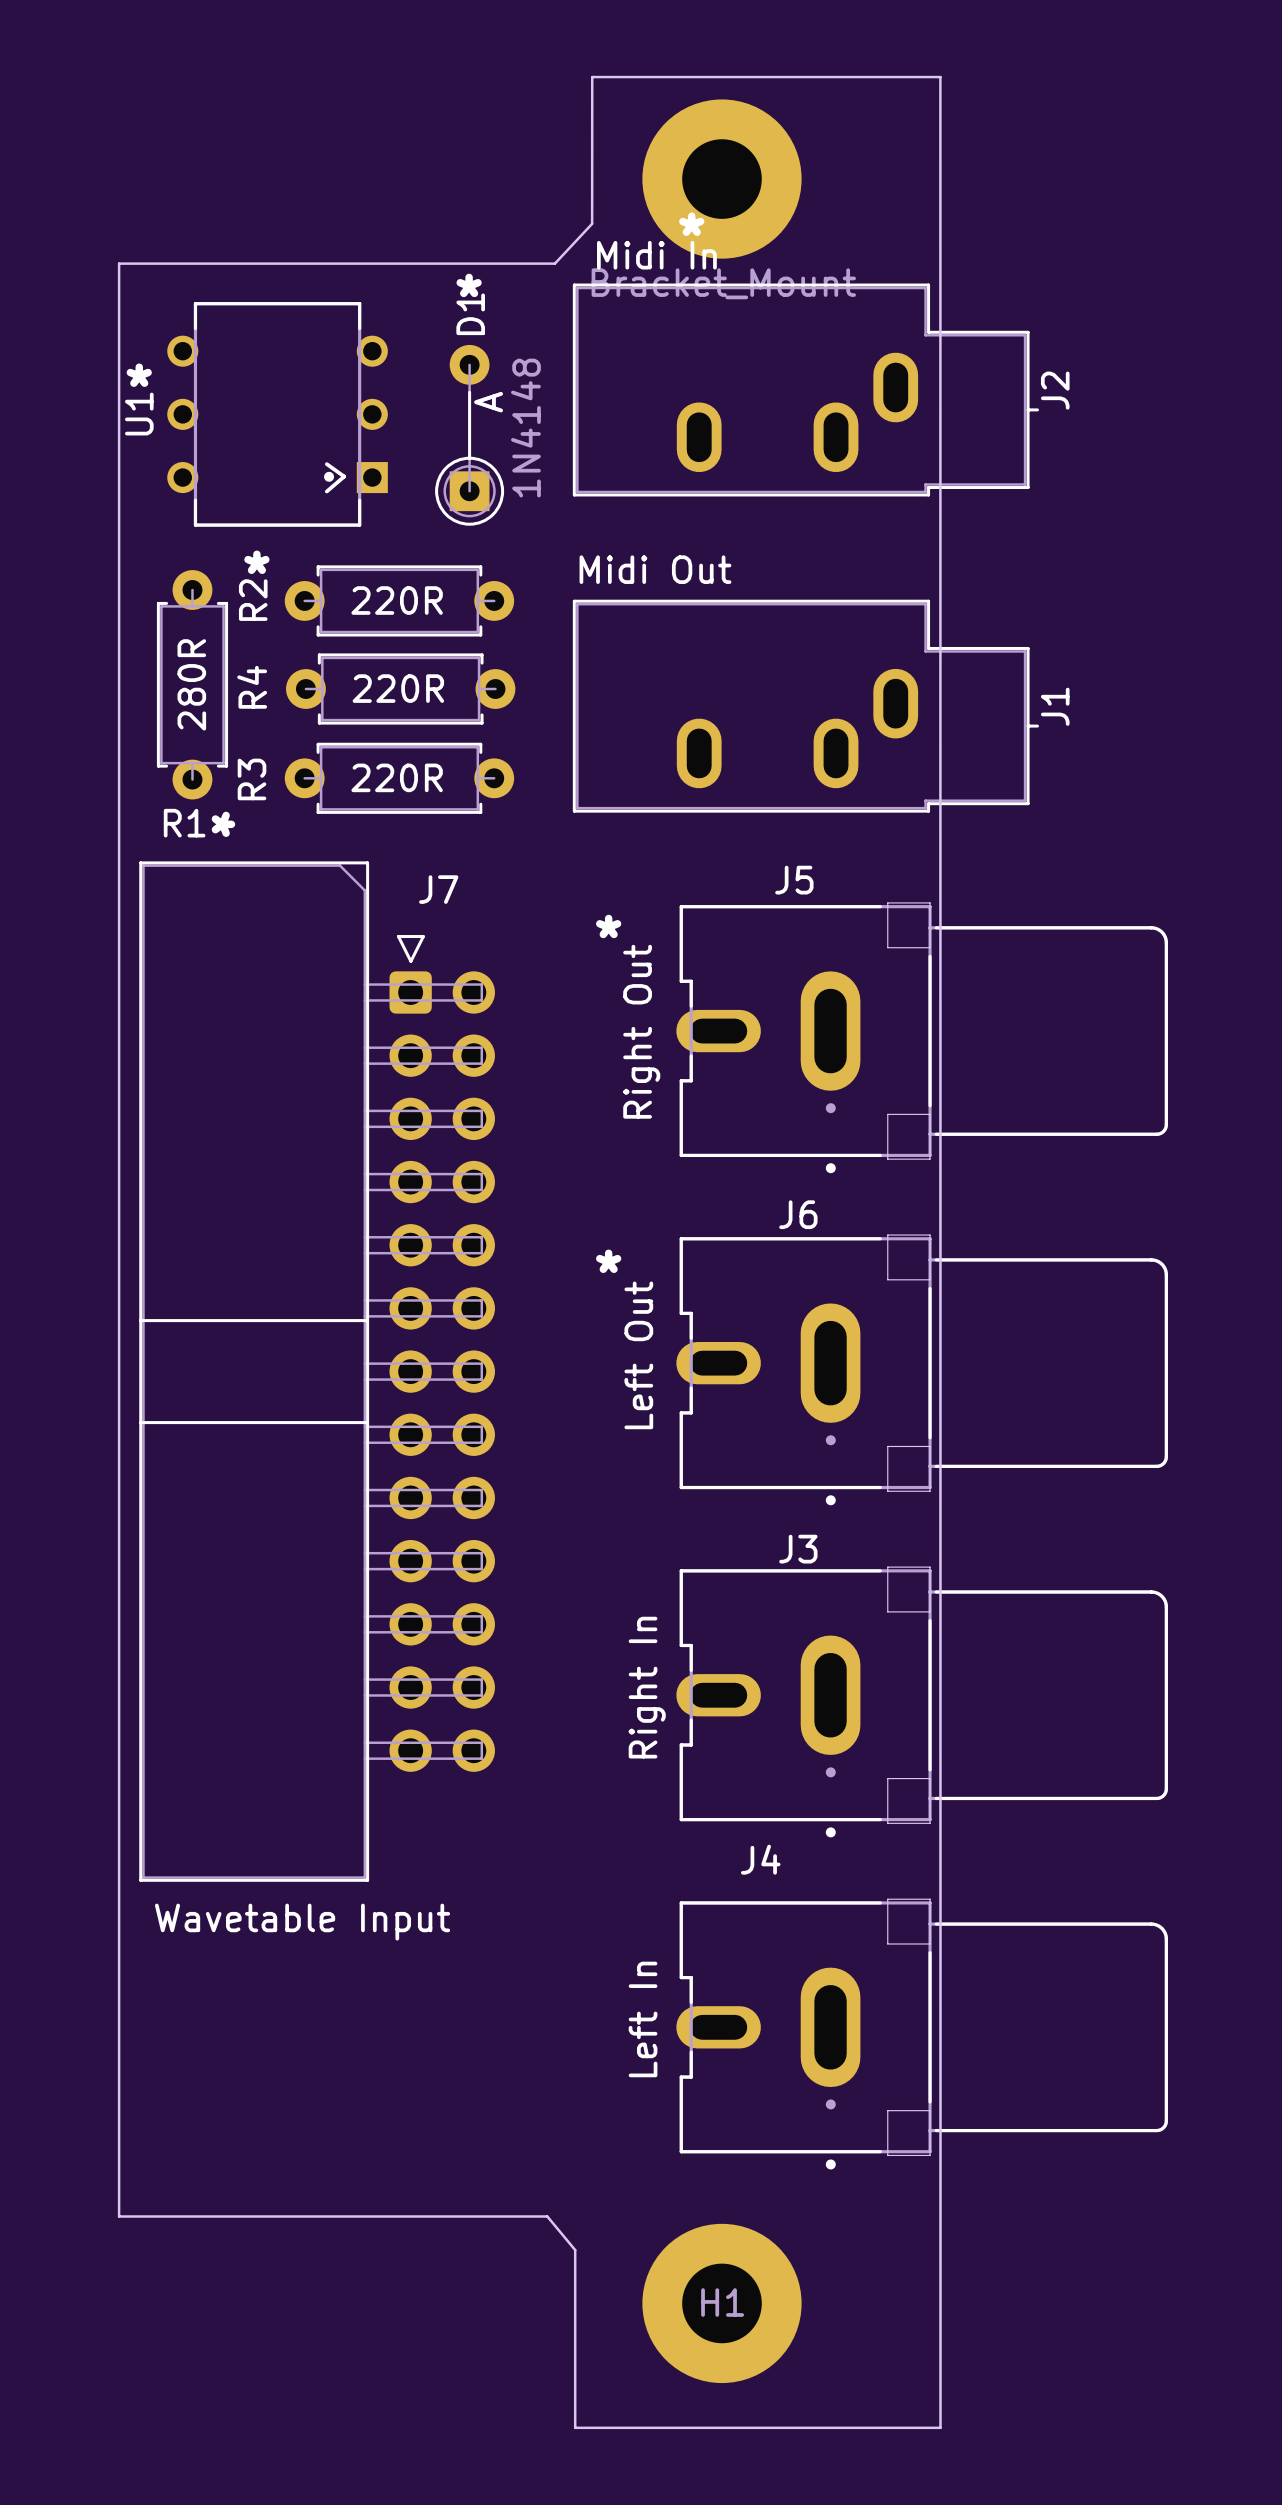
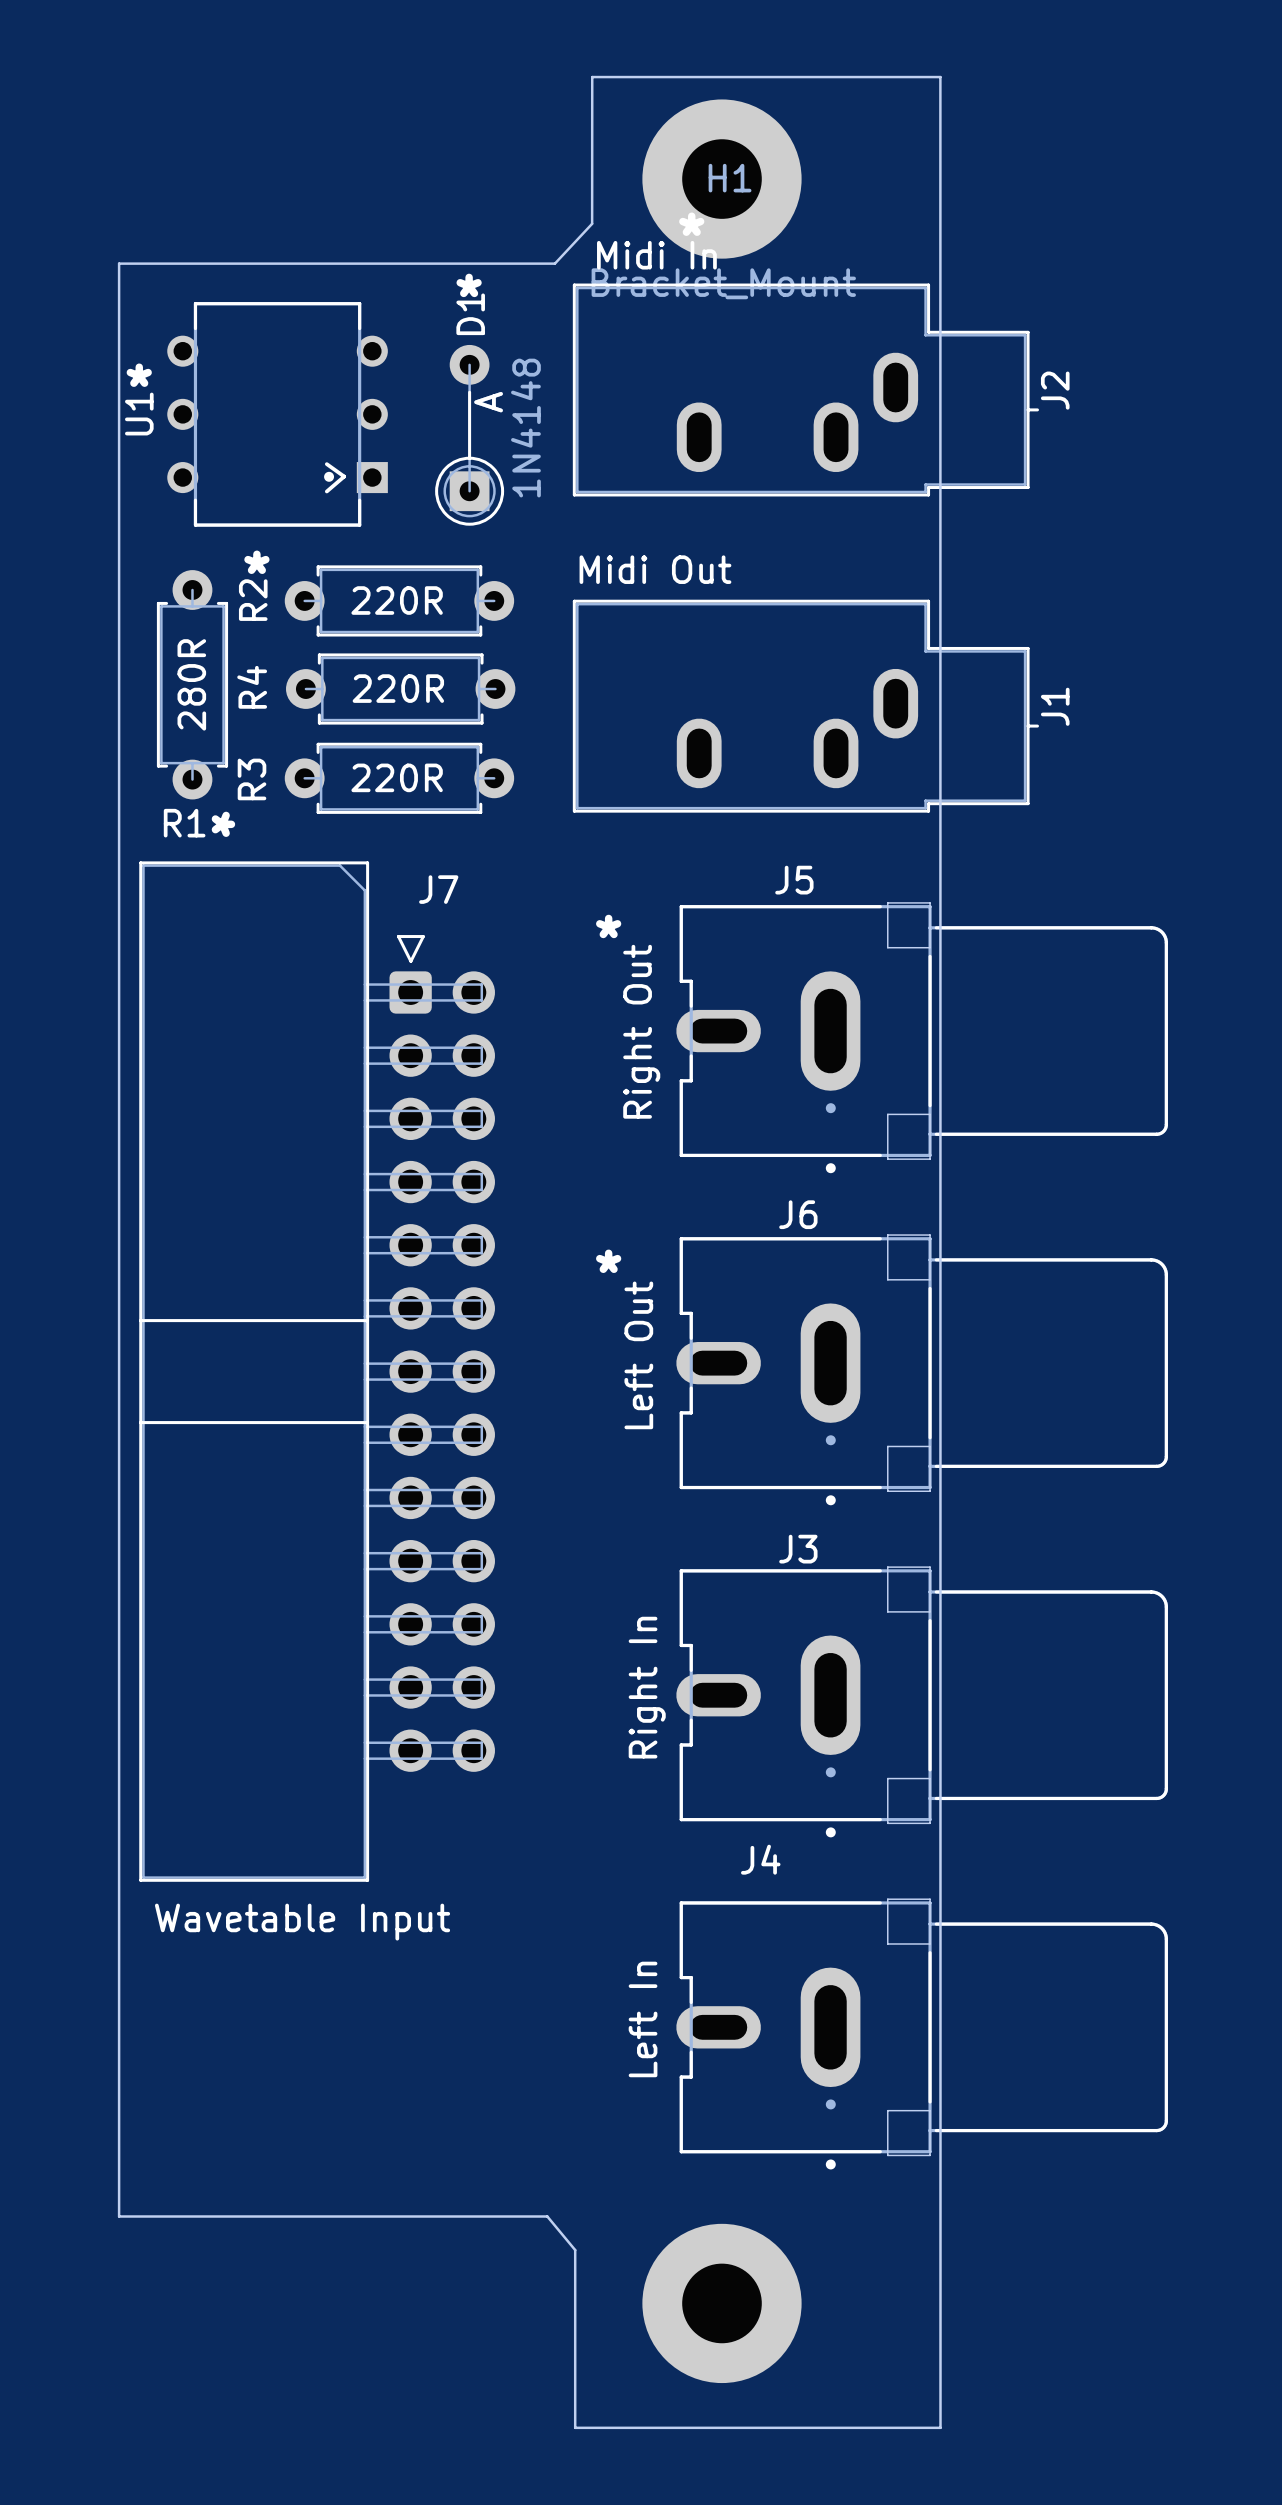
H1 name position: H1 (722, 2302) -> H1 (730, 178)

